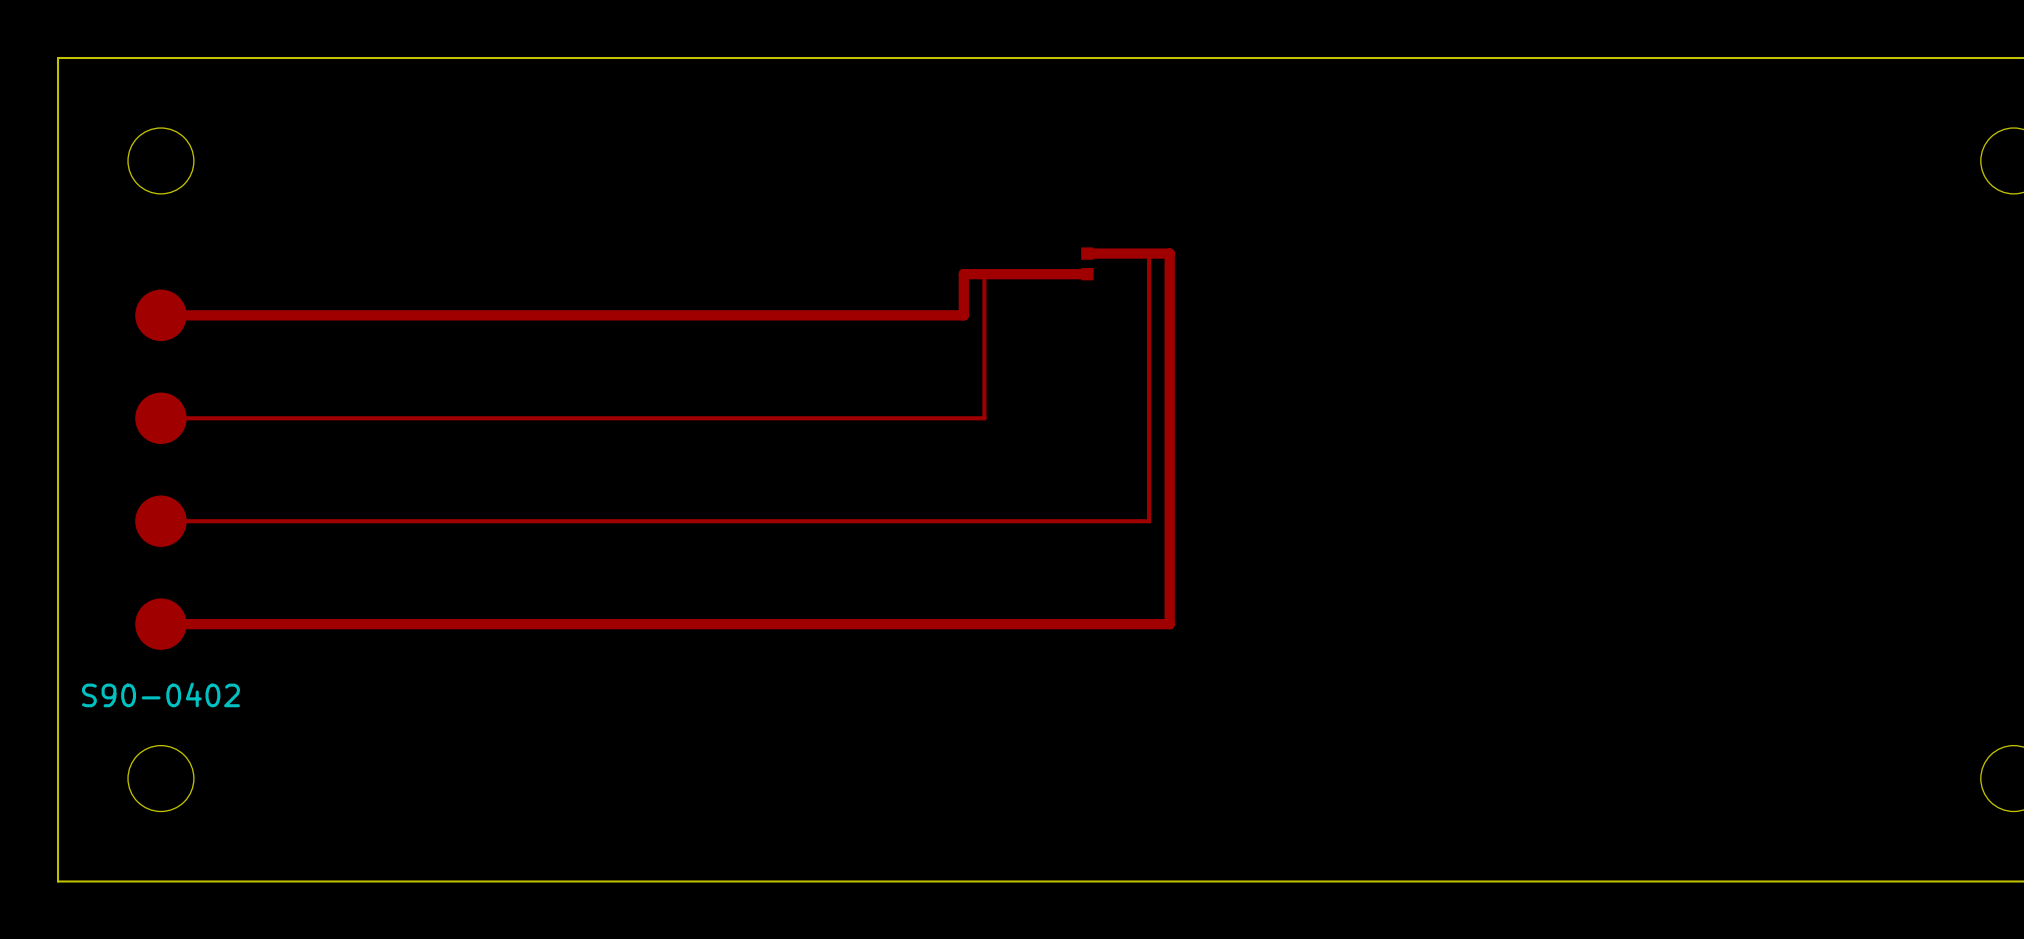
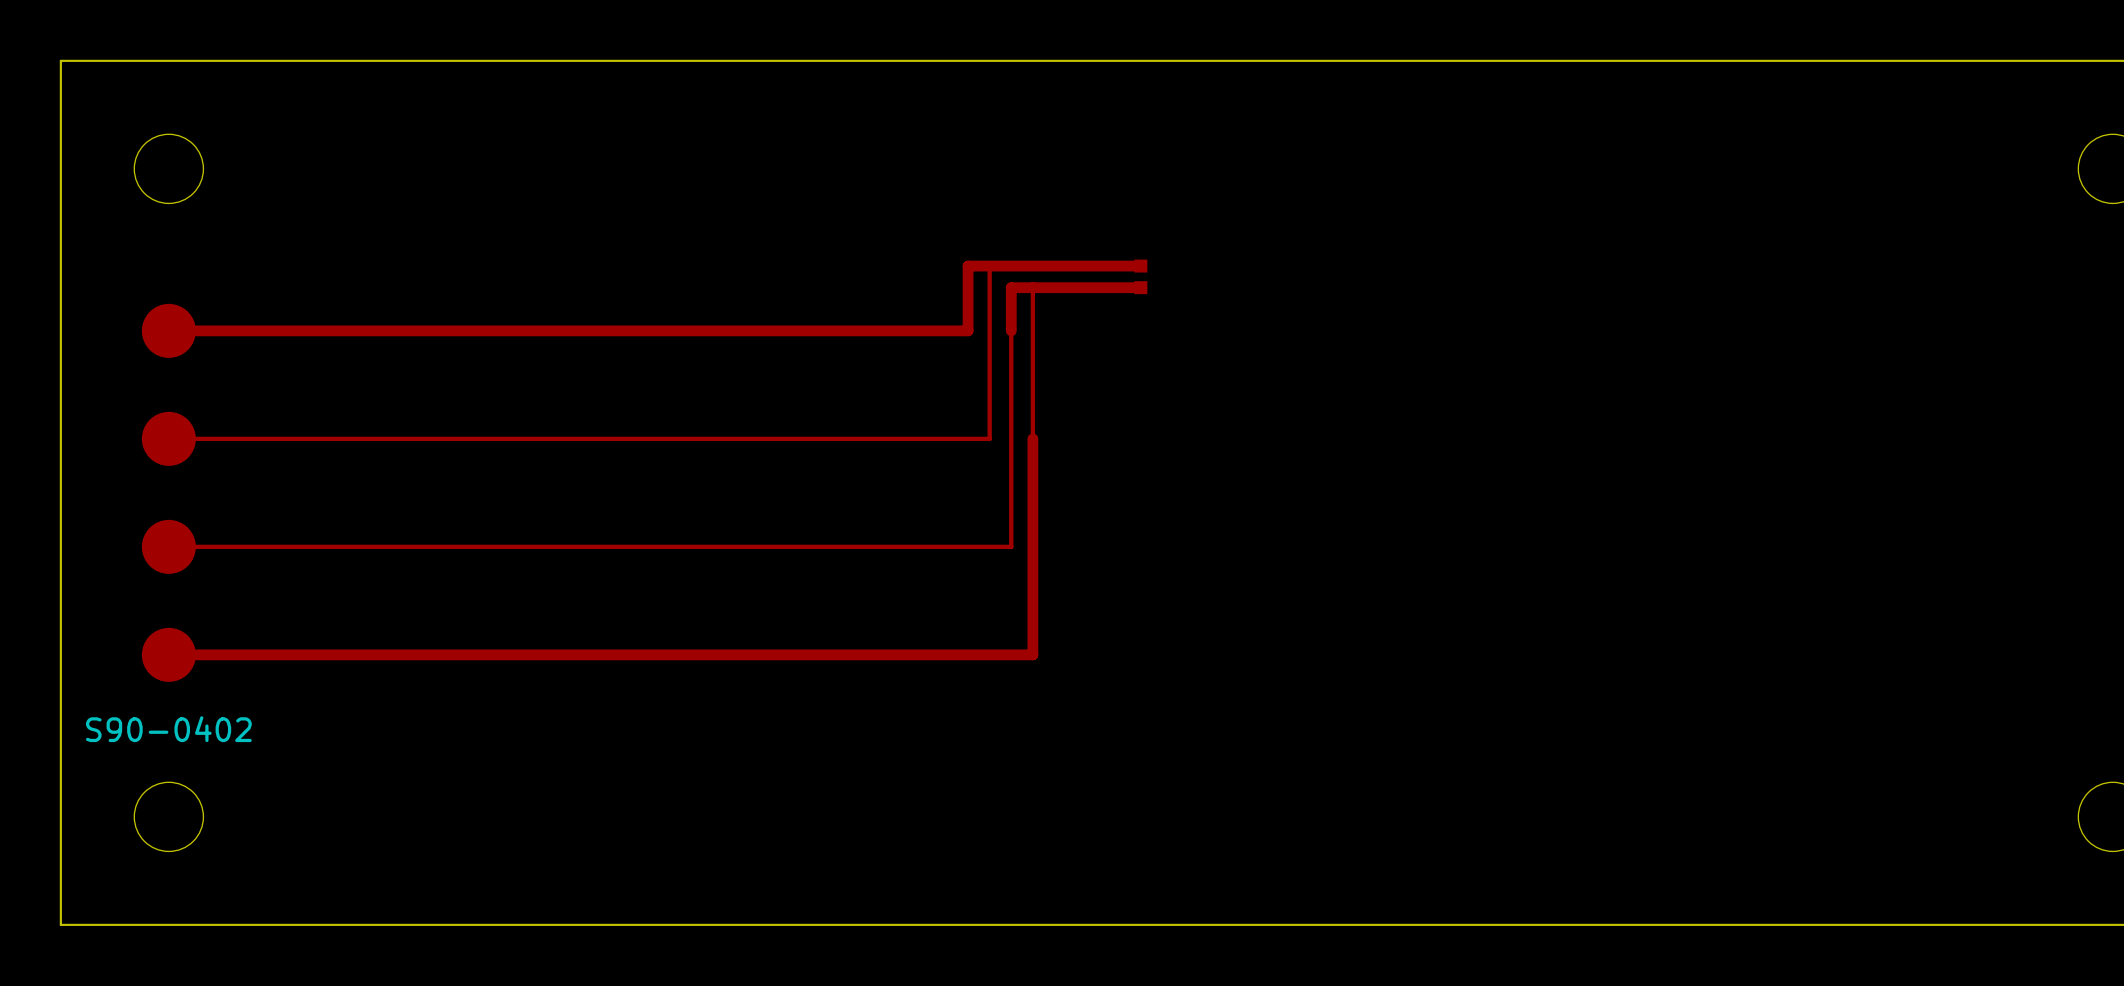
top track: (922, 315) (963, 315) -> (968, 330) (968, 266) (1140, 266) (989, 266) (989, 438)
top track: none -> (1011, 330) (1011, 546)
top track: (943, 418) (984, 418) -> none
top track: (963, 521) (1149, 521) (1149, 253) (1087, 253) (1169, 253) (1169, 624) (984, 624) -> (1032, 438) (1032, 654)

